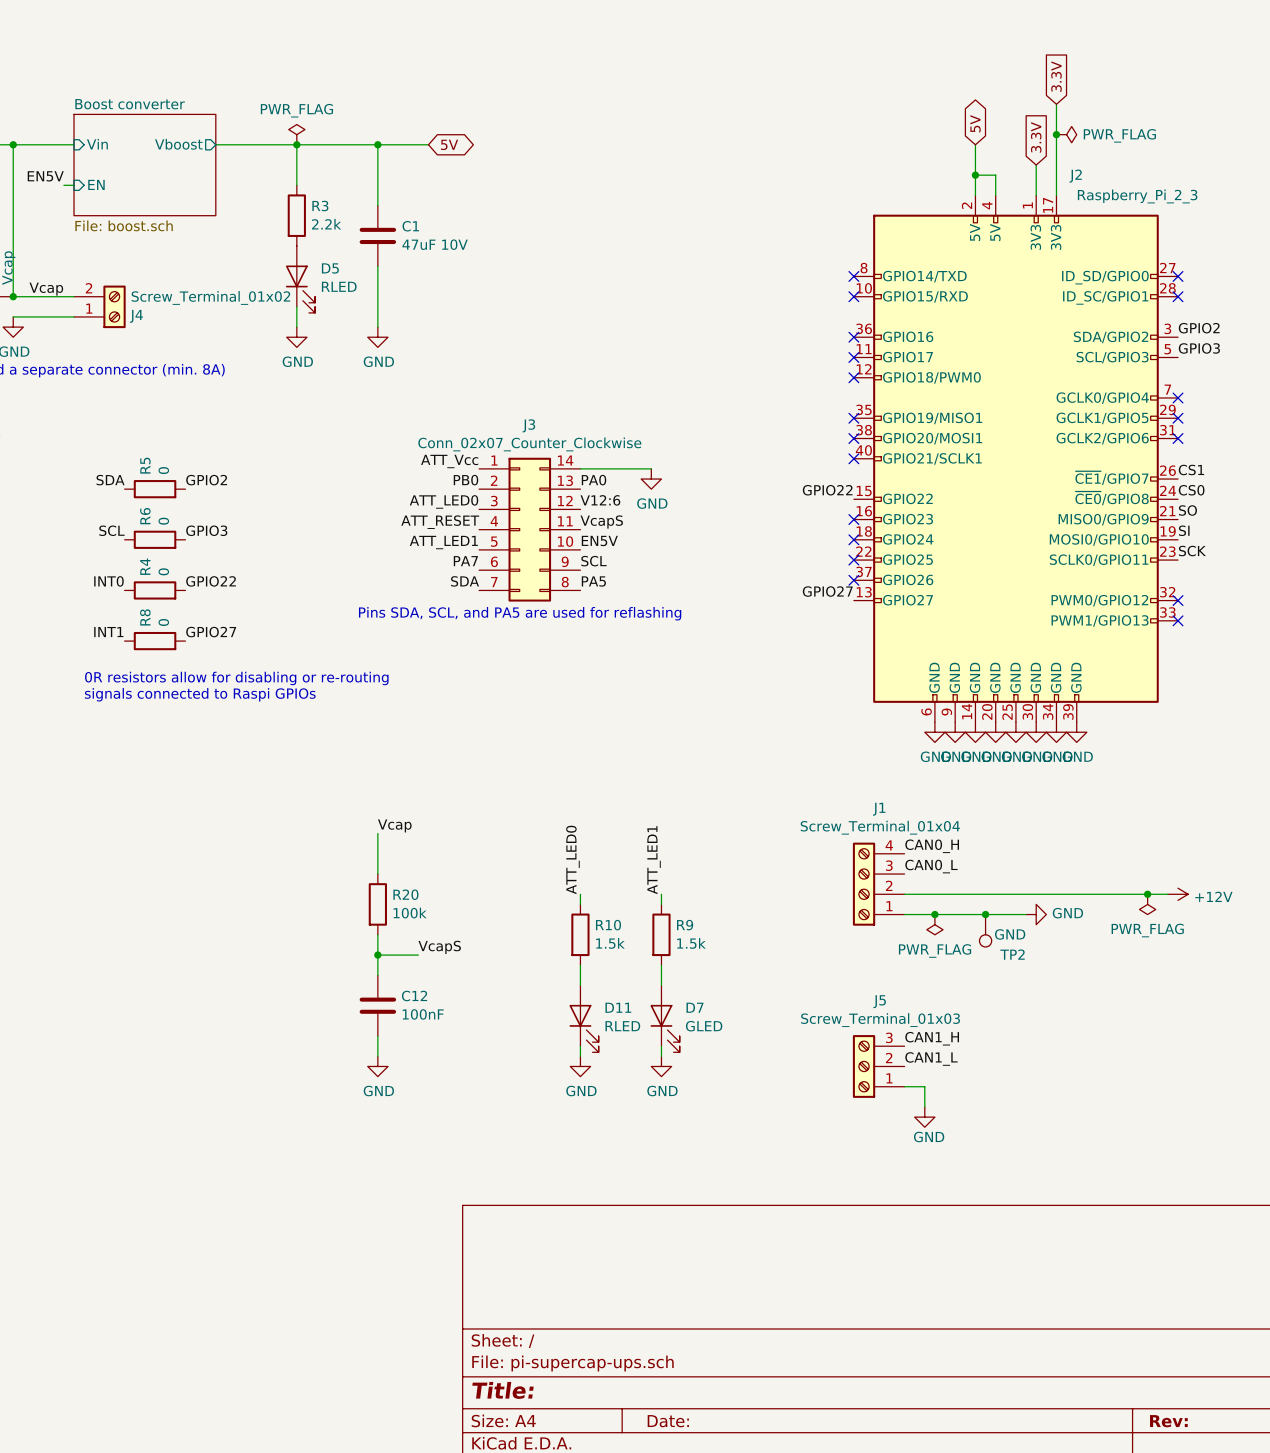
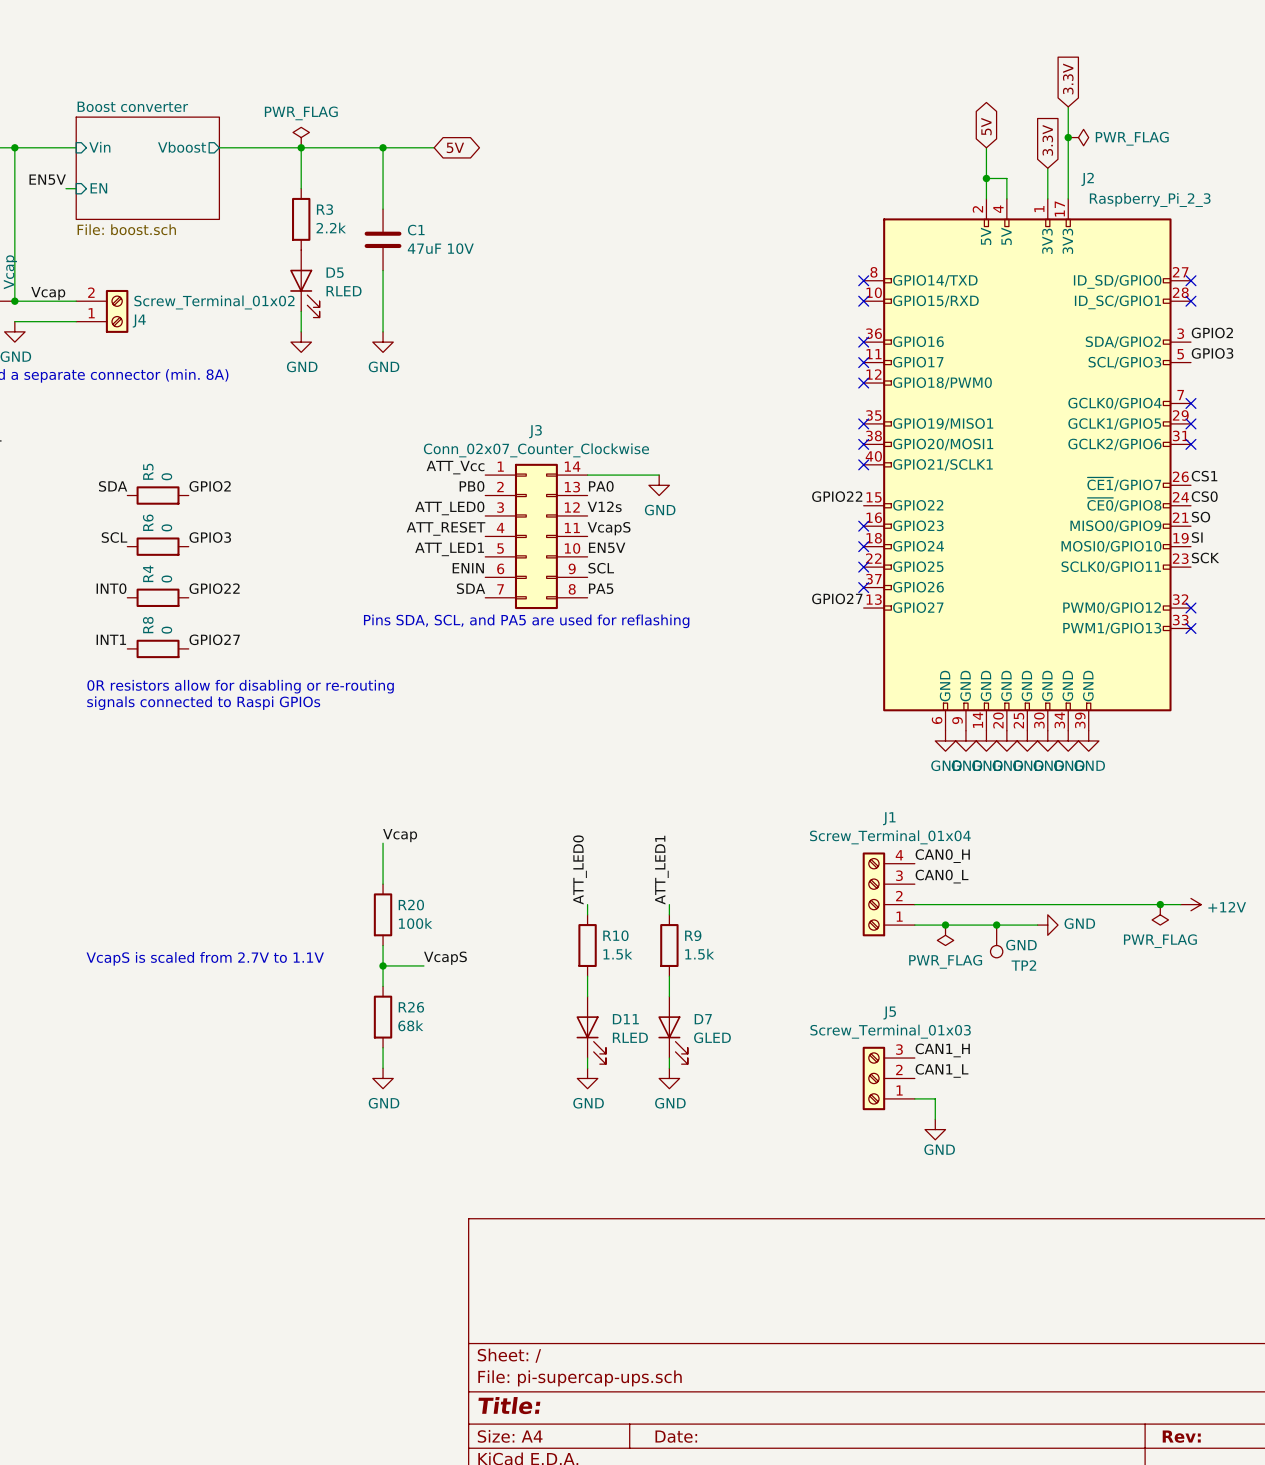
label: V12:6 (600, 500) -> V12s (604, 506)
label: PA7 (465, 561) -> ENIN (468, 568)
text: none -> VcapS is scaled from 2.7V to 1.1V (205, 958)
C12: 100nF (377, 1005) -> none
R26: none -> 68k (383, 1017)

